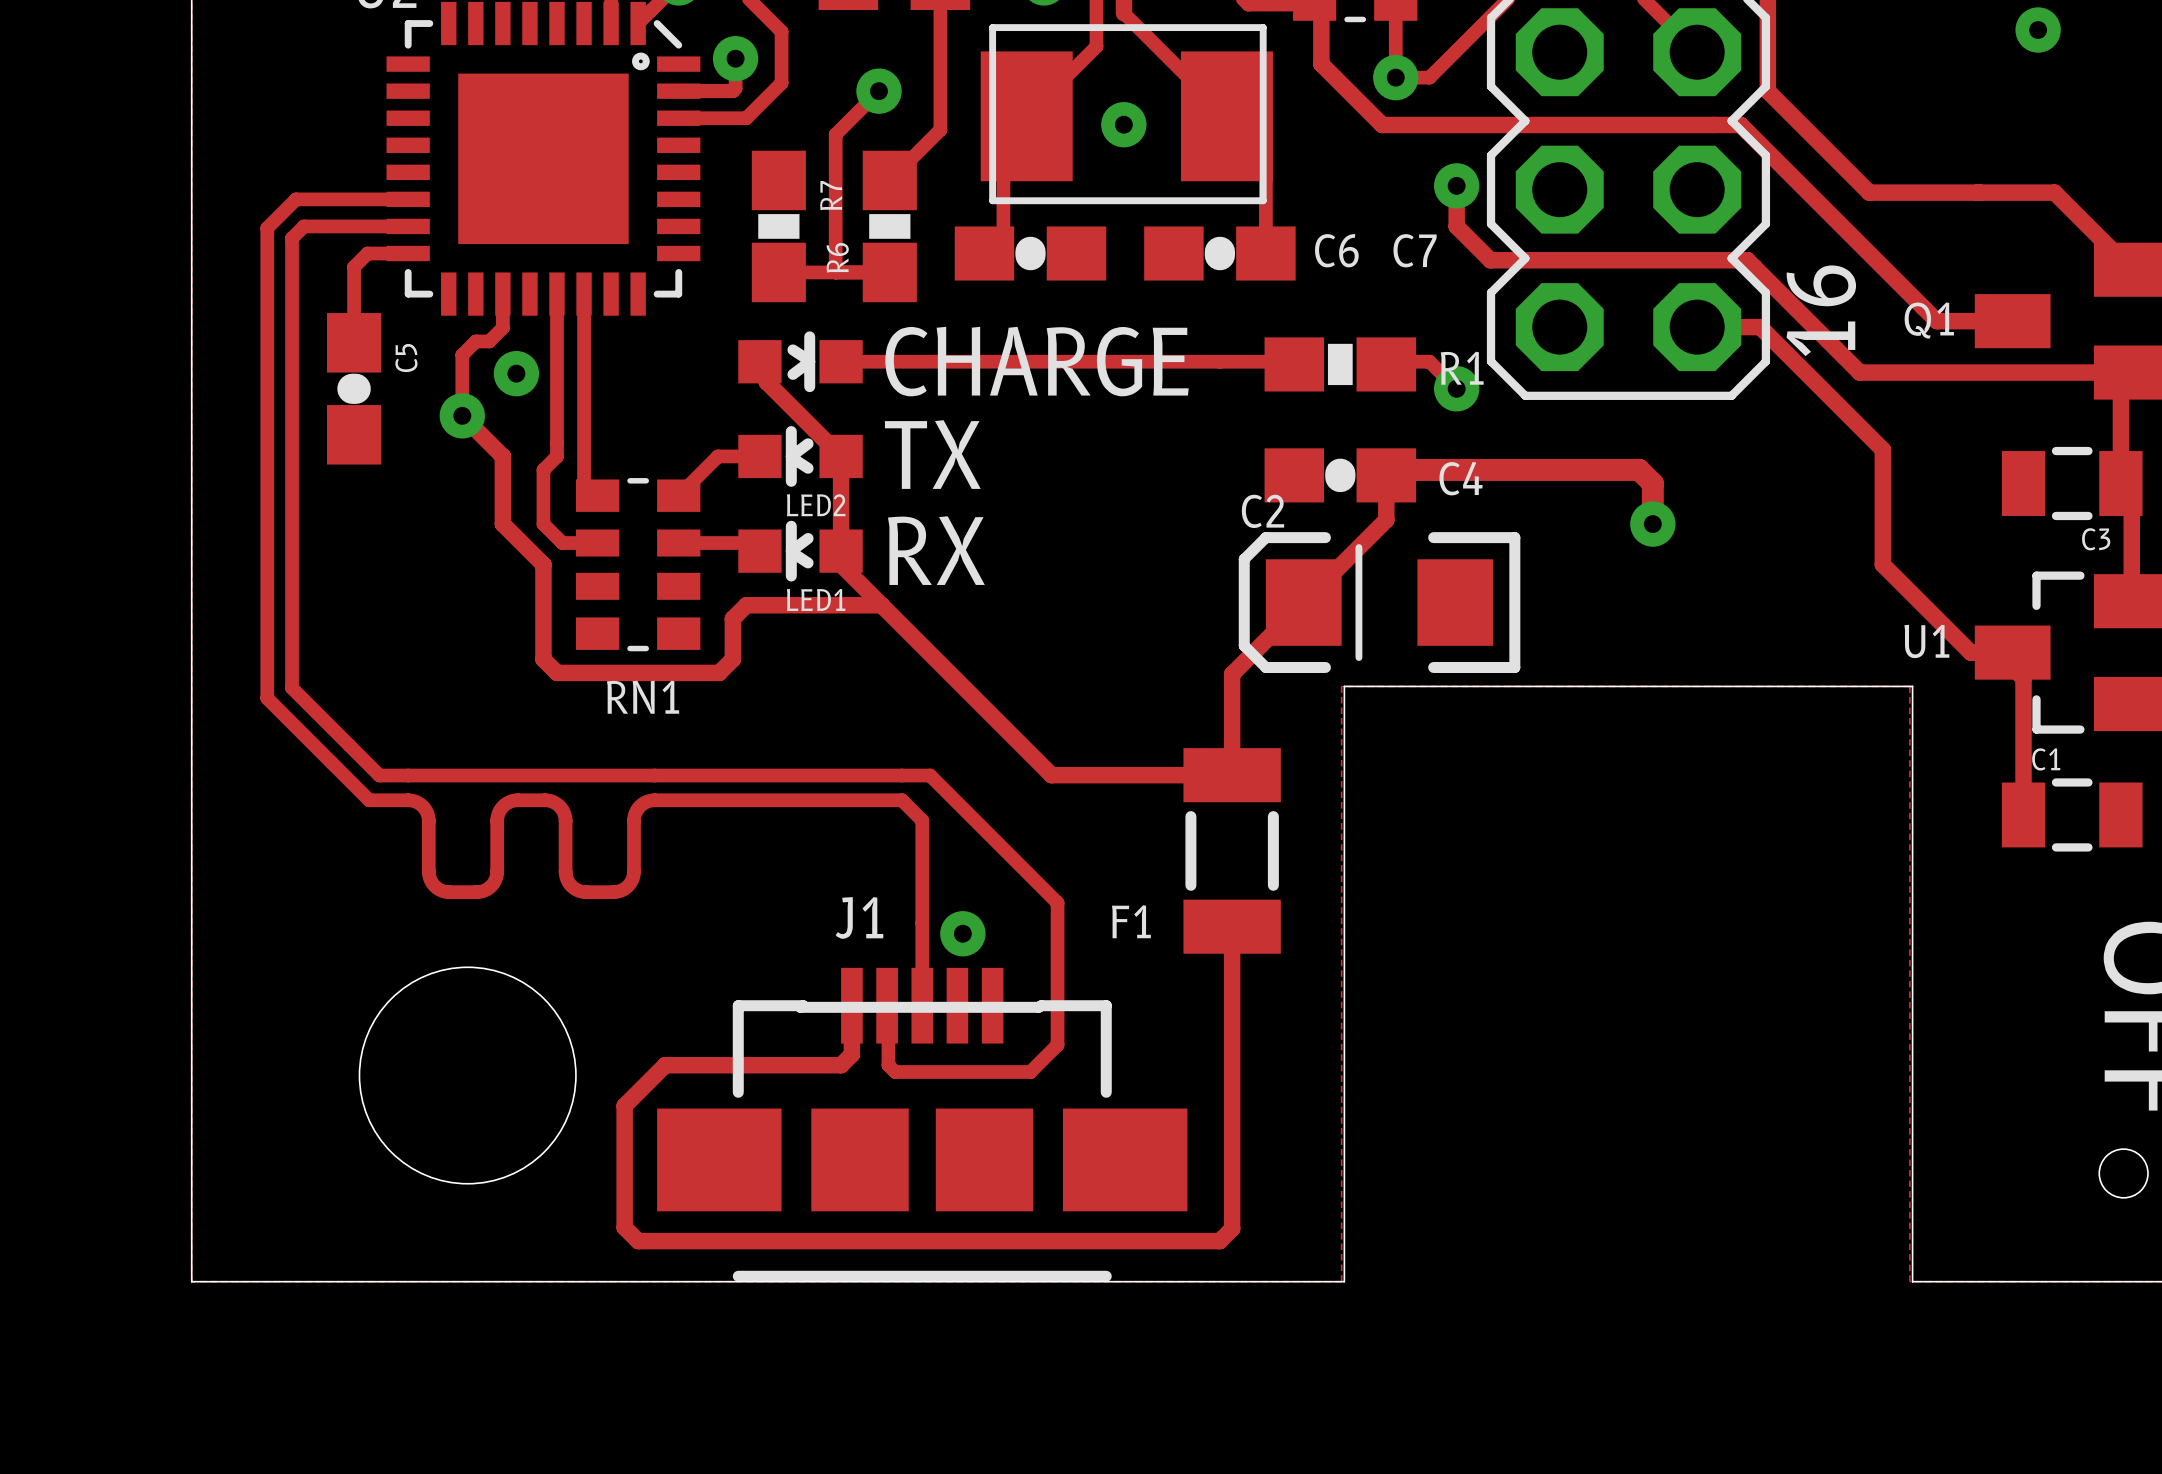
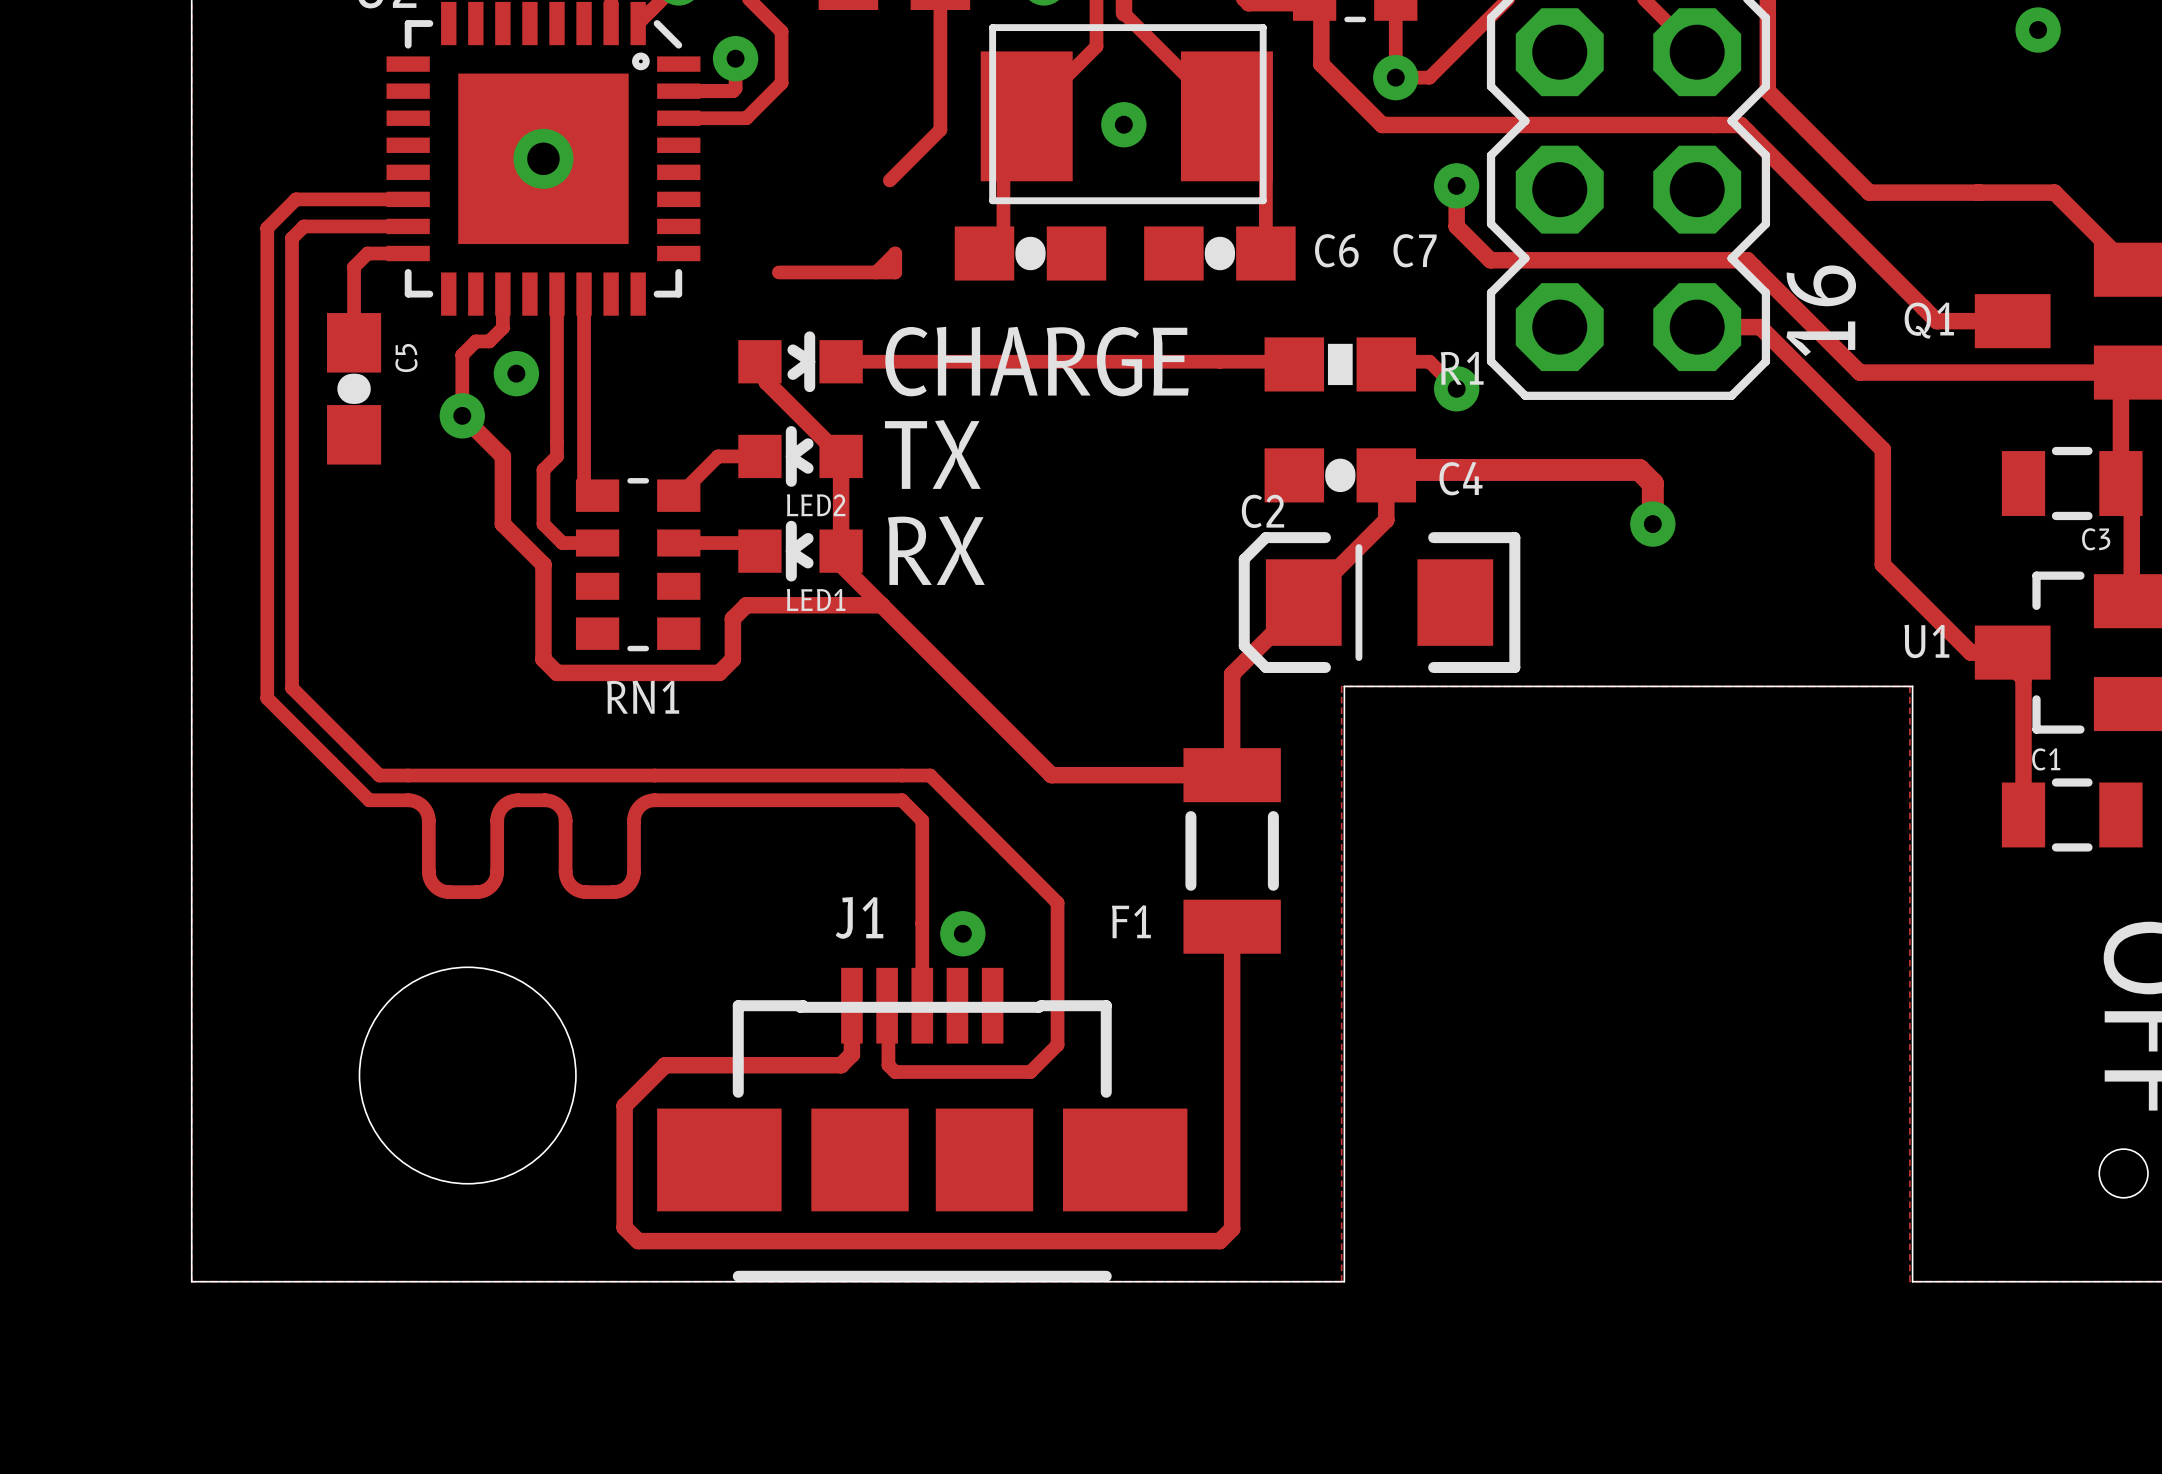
track: (878, 91) (835, 134) (835, 272) -> none
via: (878, 91) -> none
via: none -> (543, 158)
R7: (778, 226) -> none
R6: (889, 226) -> none

